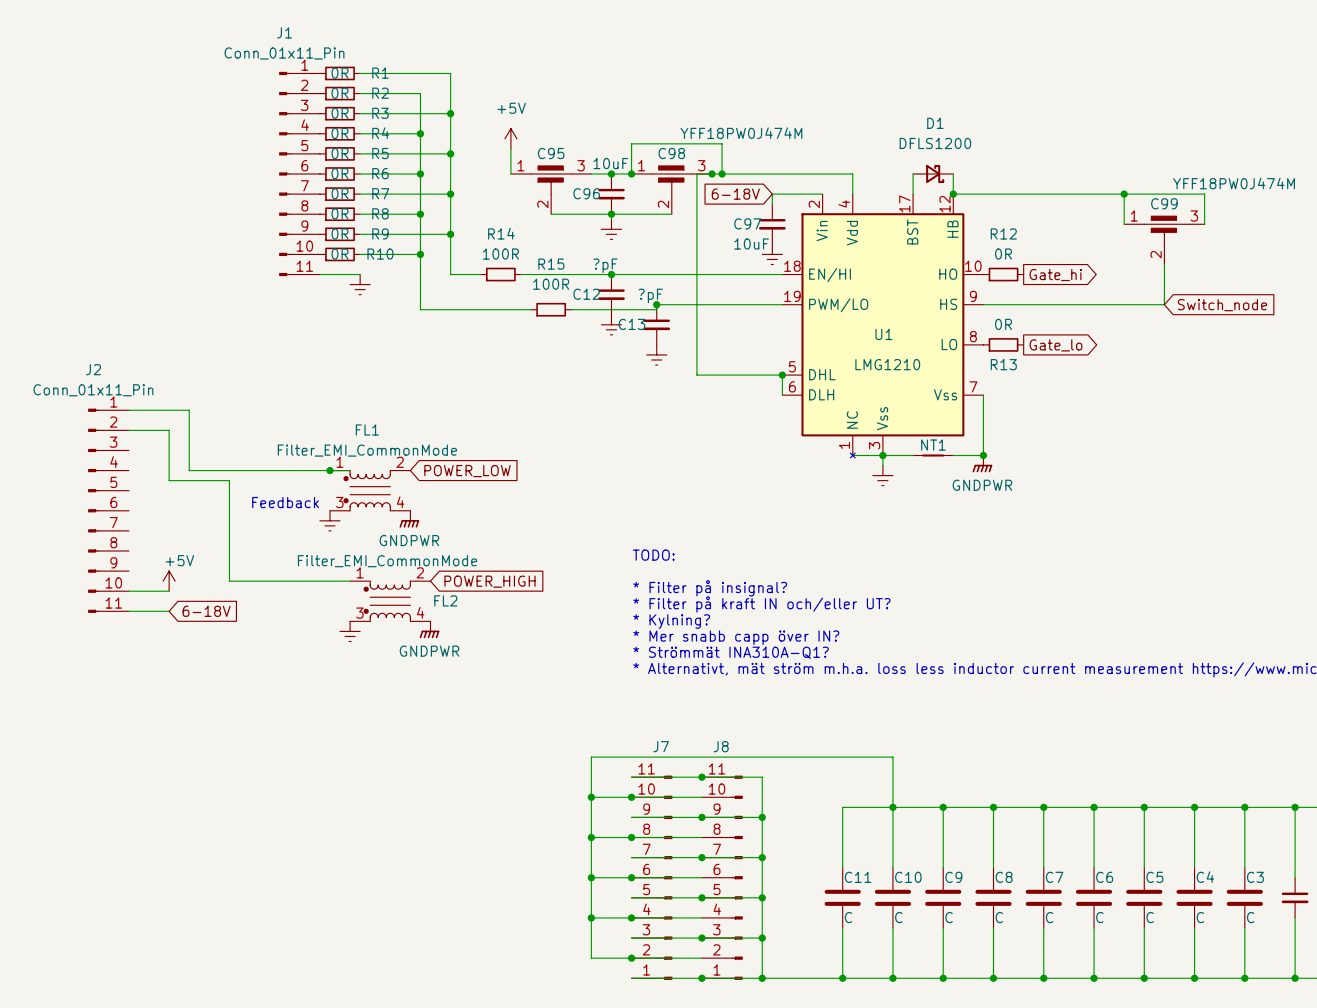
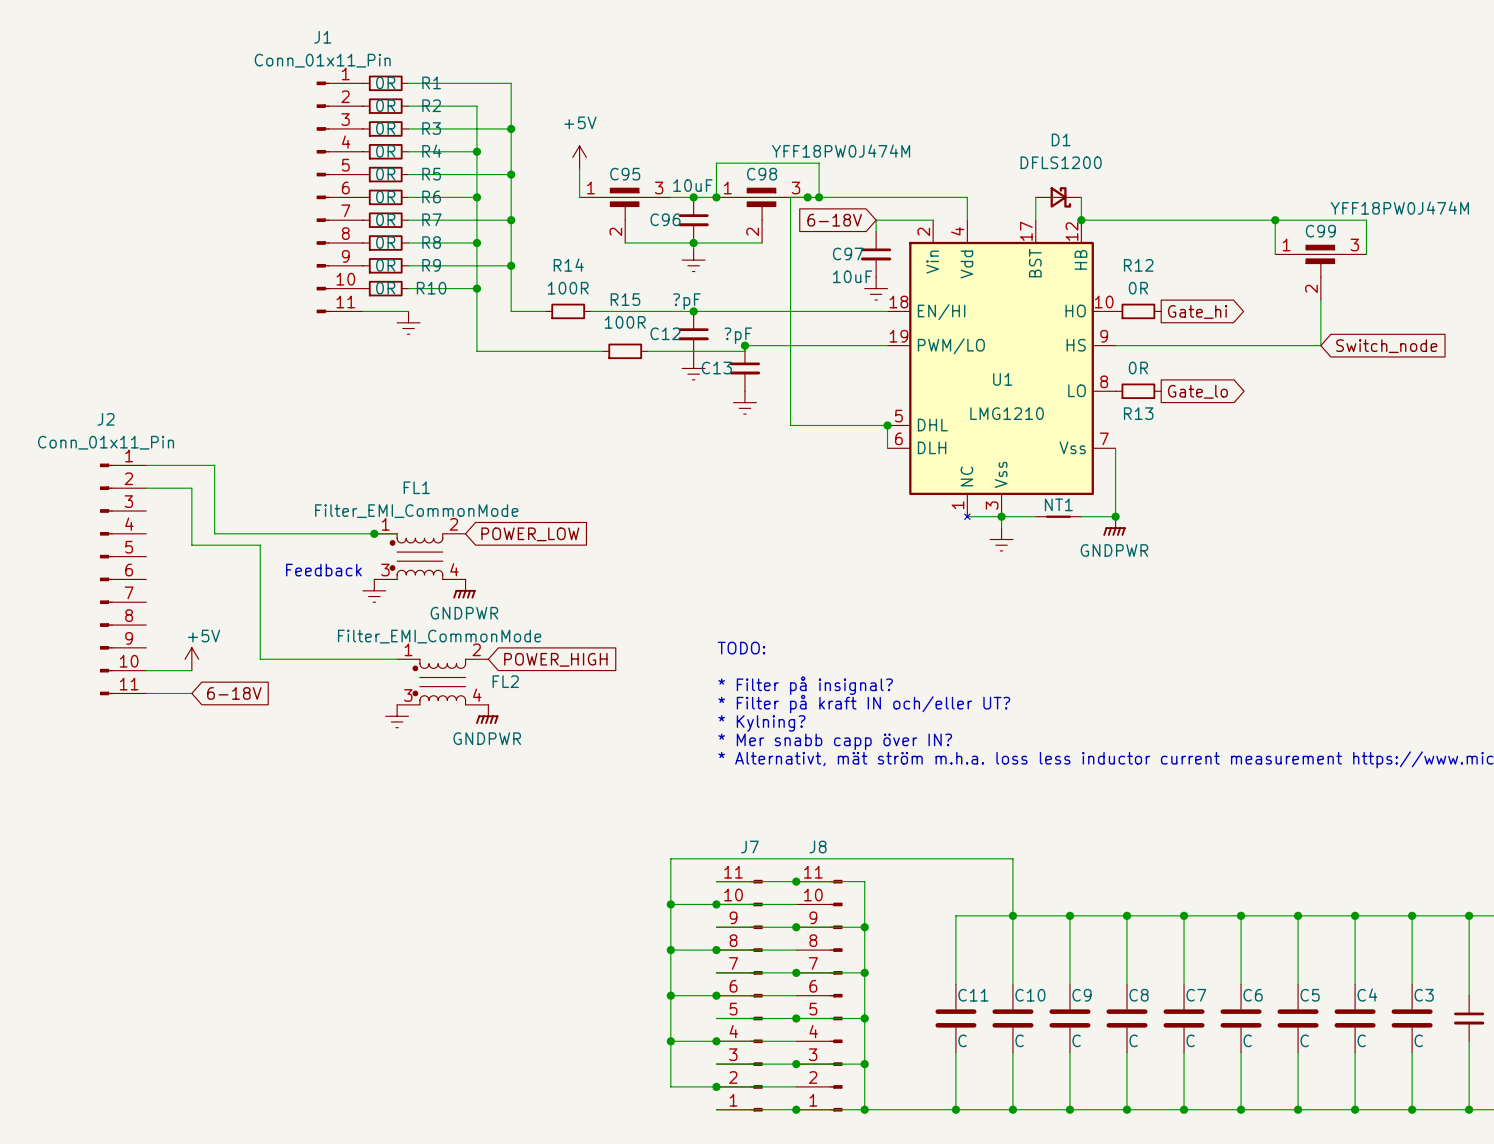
text position: TODO: (653, 555) -> TODO: (741, 648)
text: * Filter på insignal? (710, 588) -> none
text: * Filter på kraft IN och/eller UT? (761, 604) -> * Filter på insignal? (805, 685)
text: * Kylning? (671, 621) -> * Filter på kraft IN och/eller UT? (864, 703)
text: * Mer snabb capp över IN? (736, 637) -> * Kylning? (761, 723)
text: * Strömmät INA310A-Q1? (730, 652) -> * Mer snabb capp över IN? (835, 741)

